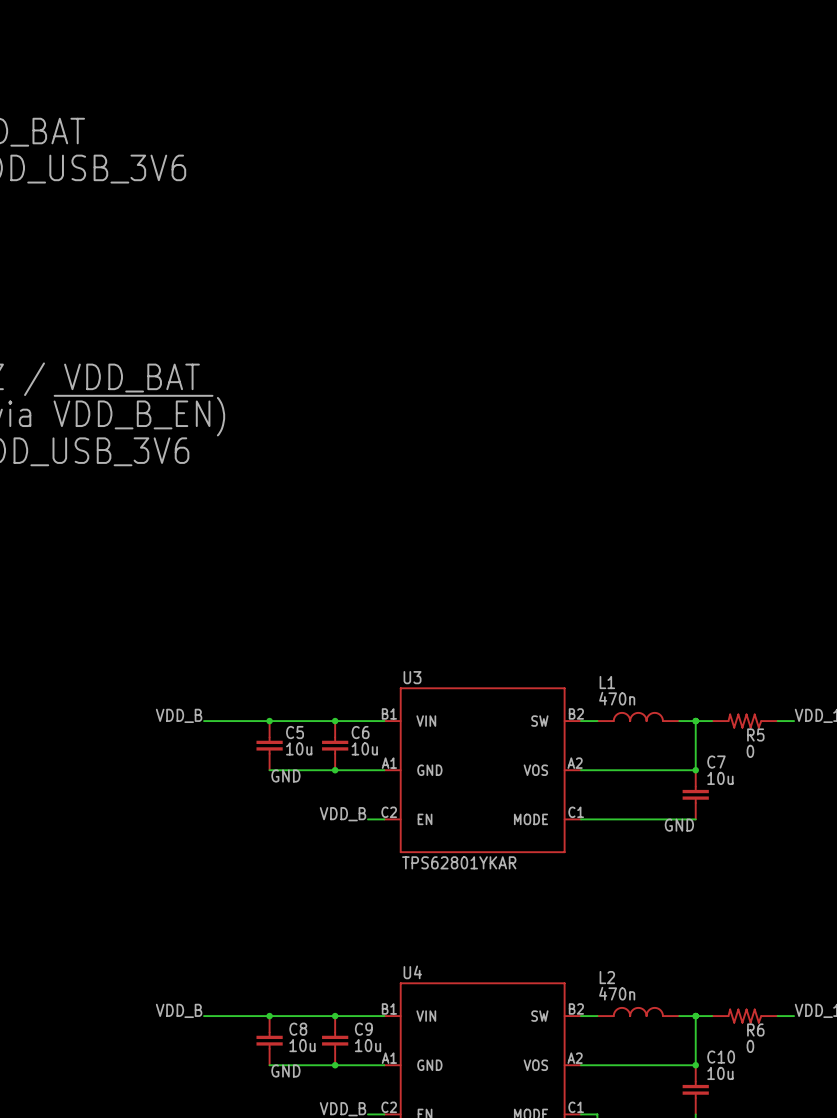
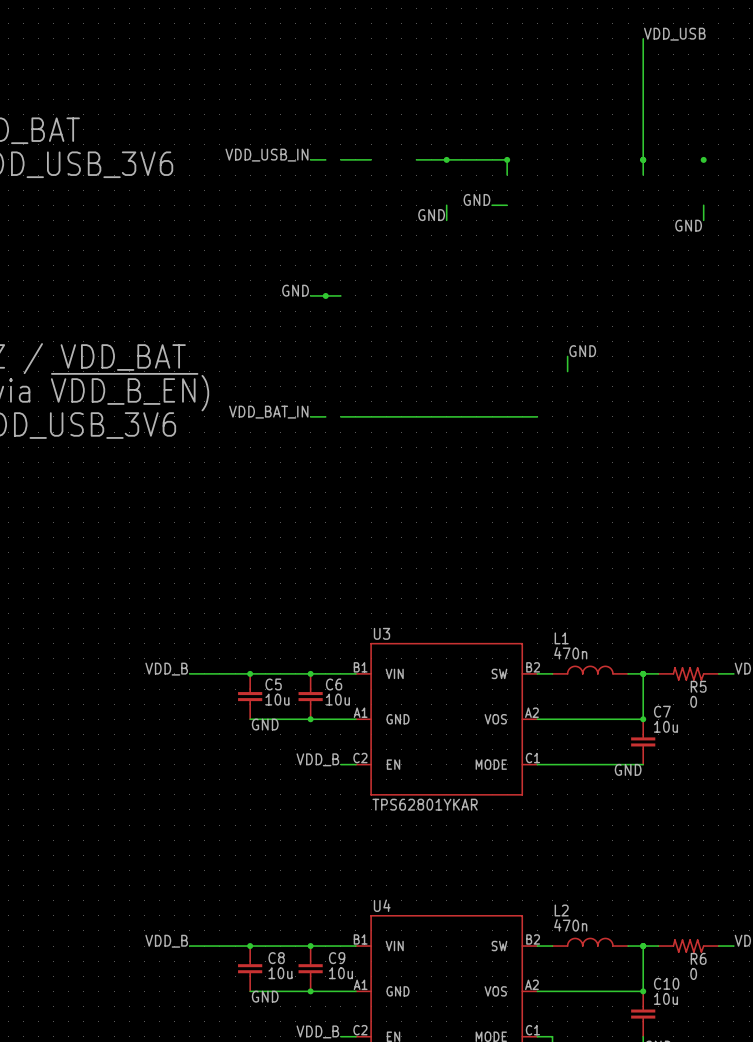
label: none -> VDD_USB (674, 34)
wire: none -> (643, 38) (643, 175)
label: none -> VDD_USB_IN (266, 155)
wire: none -> (310, 159) (325, 159)
wire: none -> (340, 159) (371, 159)
wire: none -> (416, 159) (507, 159) (507, 175)
junction: none -> (446, 159)
junction: none -> (507, 159)
junction: none -> (643, 159)
junction: none -> (703, 159)
label: none -> GND (476, 199)
wire: none -> (446, 205) (446, 220)
wire: none -> (492, 205) (507, 205)
wire: none -> (703, 205) (703, 220)
label: none -> GND (431, 215)
label: none -> GND (688, 225)
label: none -> GND (295, 290)
wire: none -> (310, 295) (340, 295)
junction: none -> (325, 295)
label: none -> GND (582, 351)
wire: none -> (567, 356) (567, 371)
label: none -> VDD_BAT_IN (268, 412)
wire: none -> (310, 416) (325, 416)
wire: none -> (340, 416) (537, 416)

